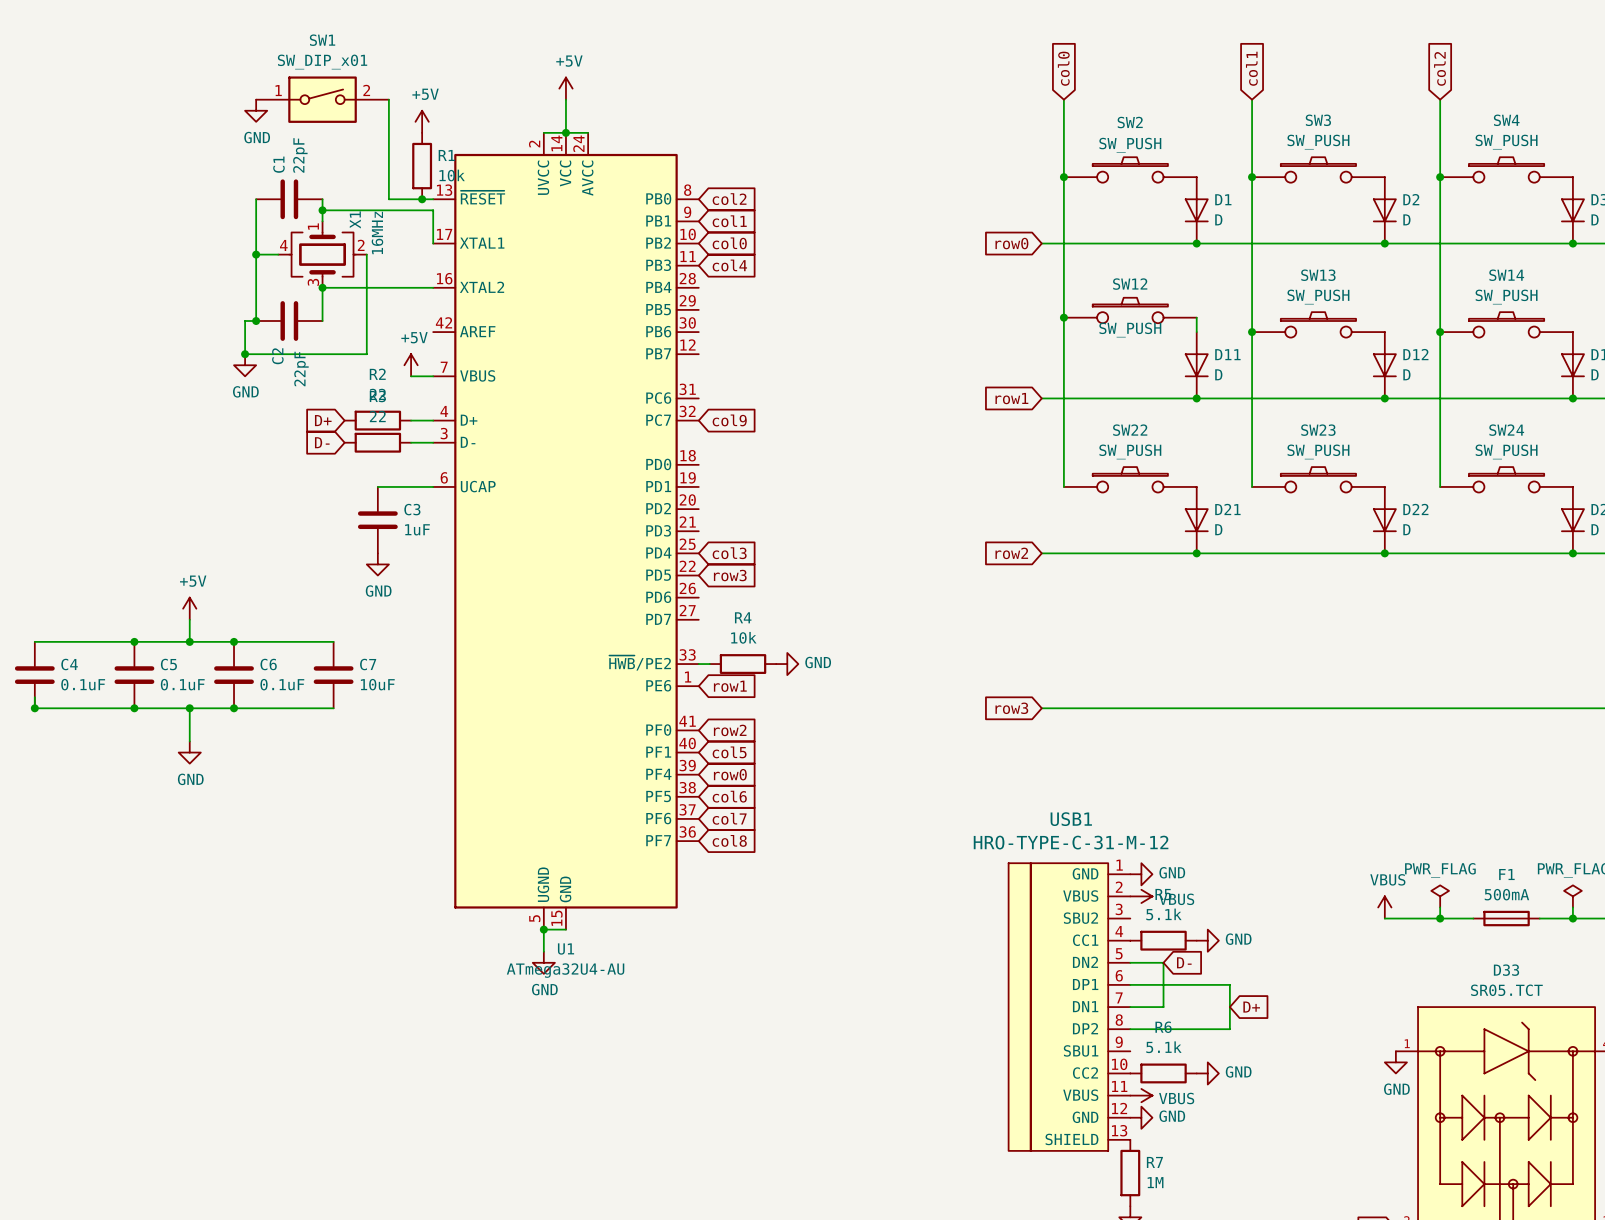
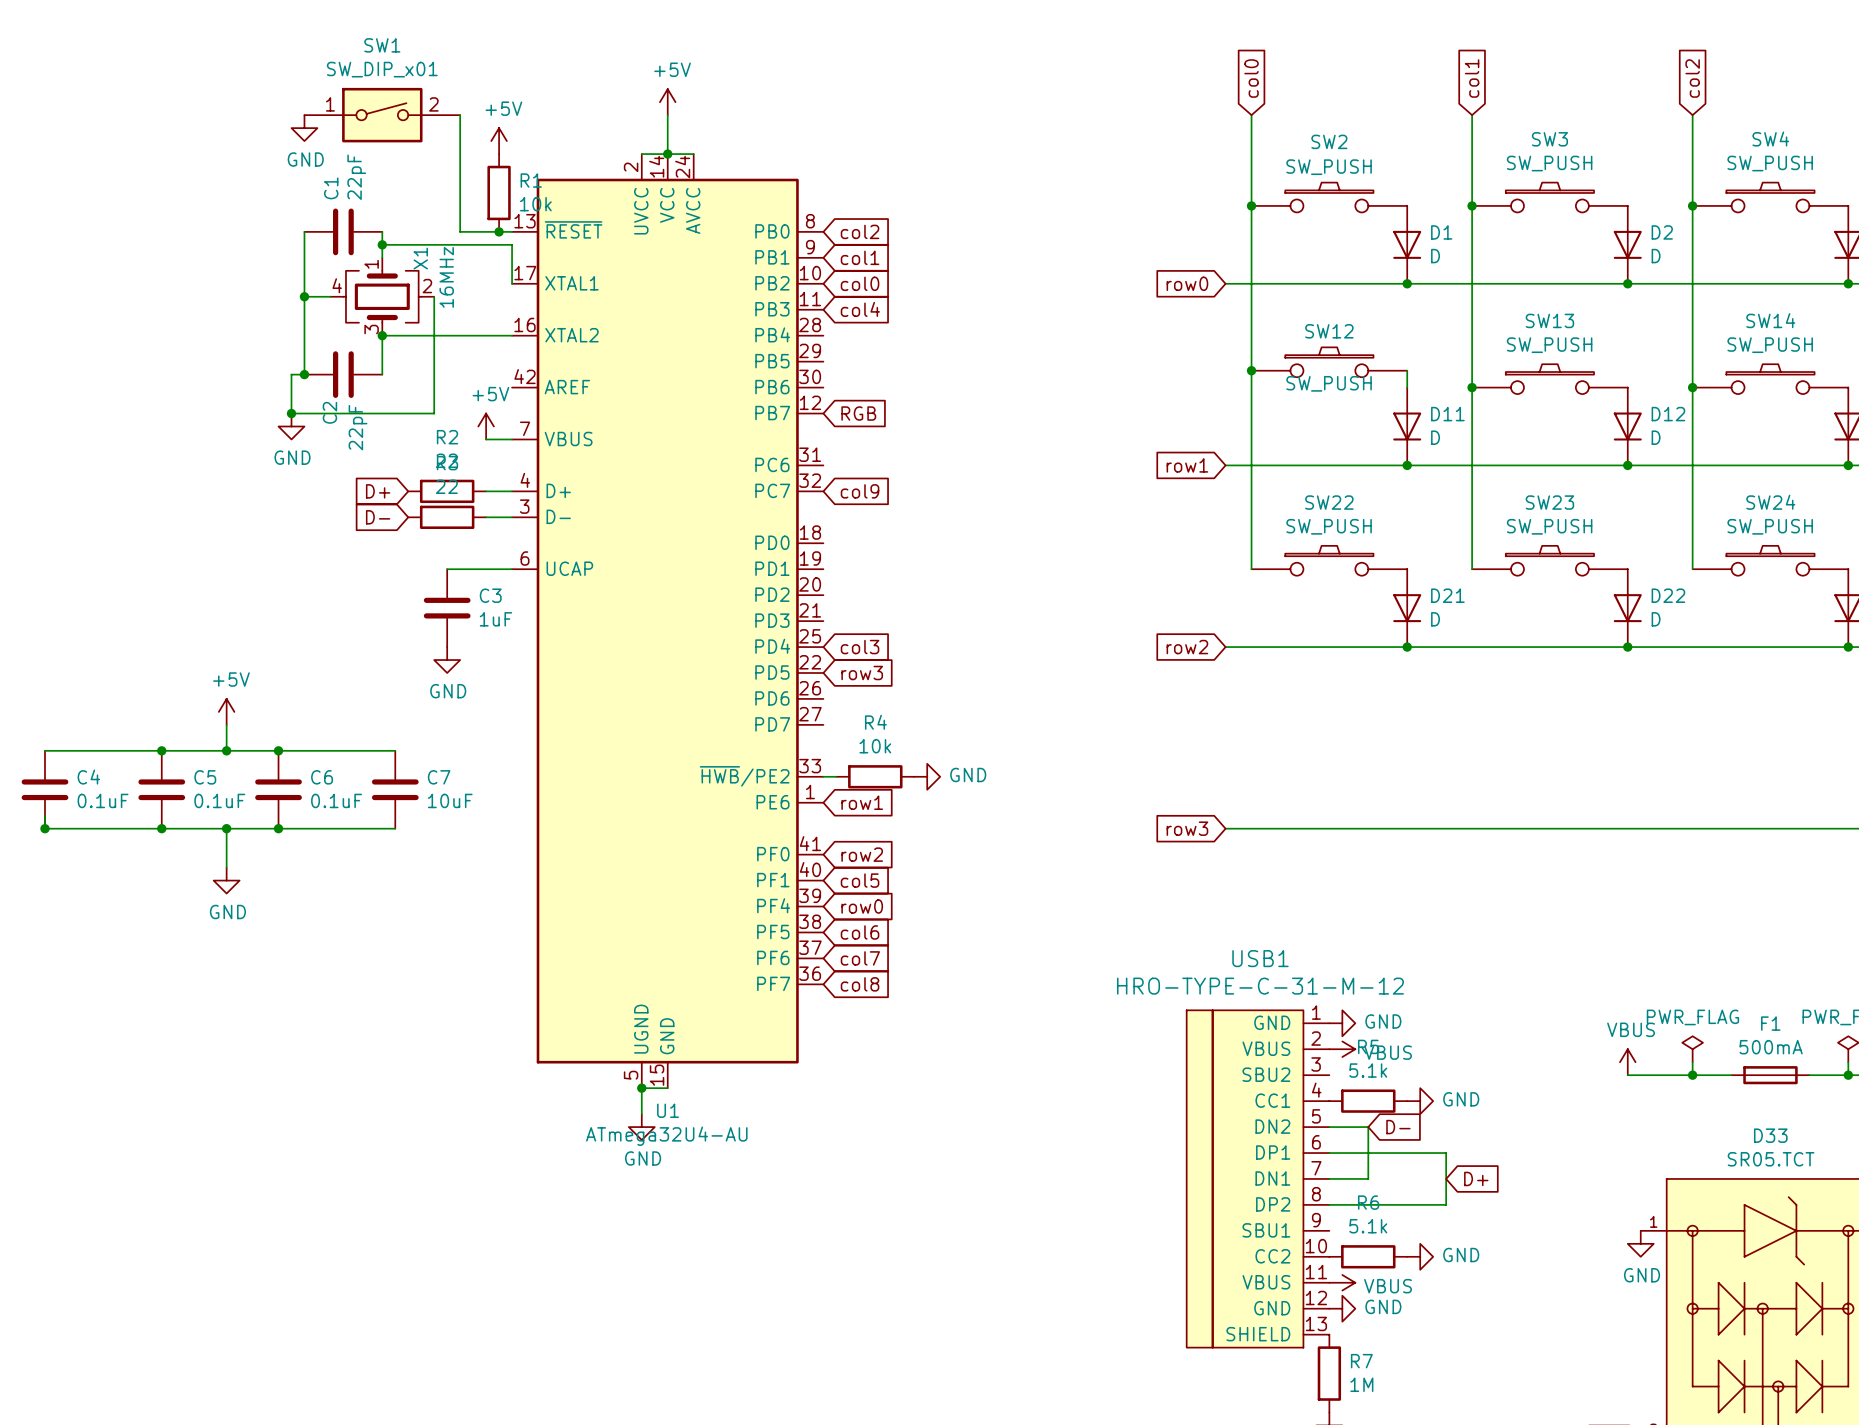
global label: none -> RGB (858, 413)

